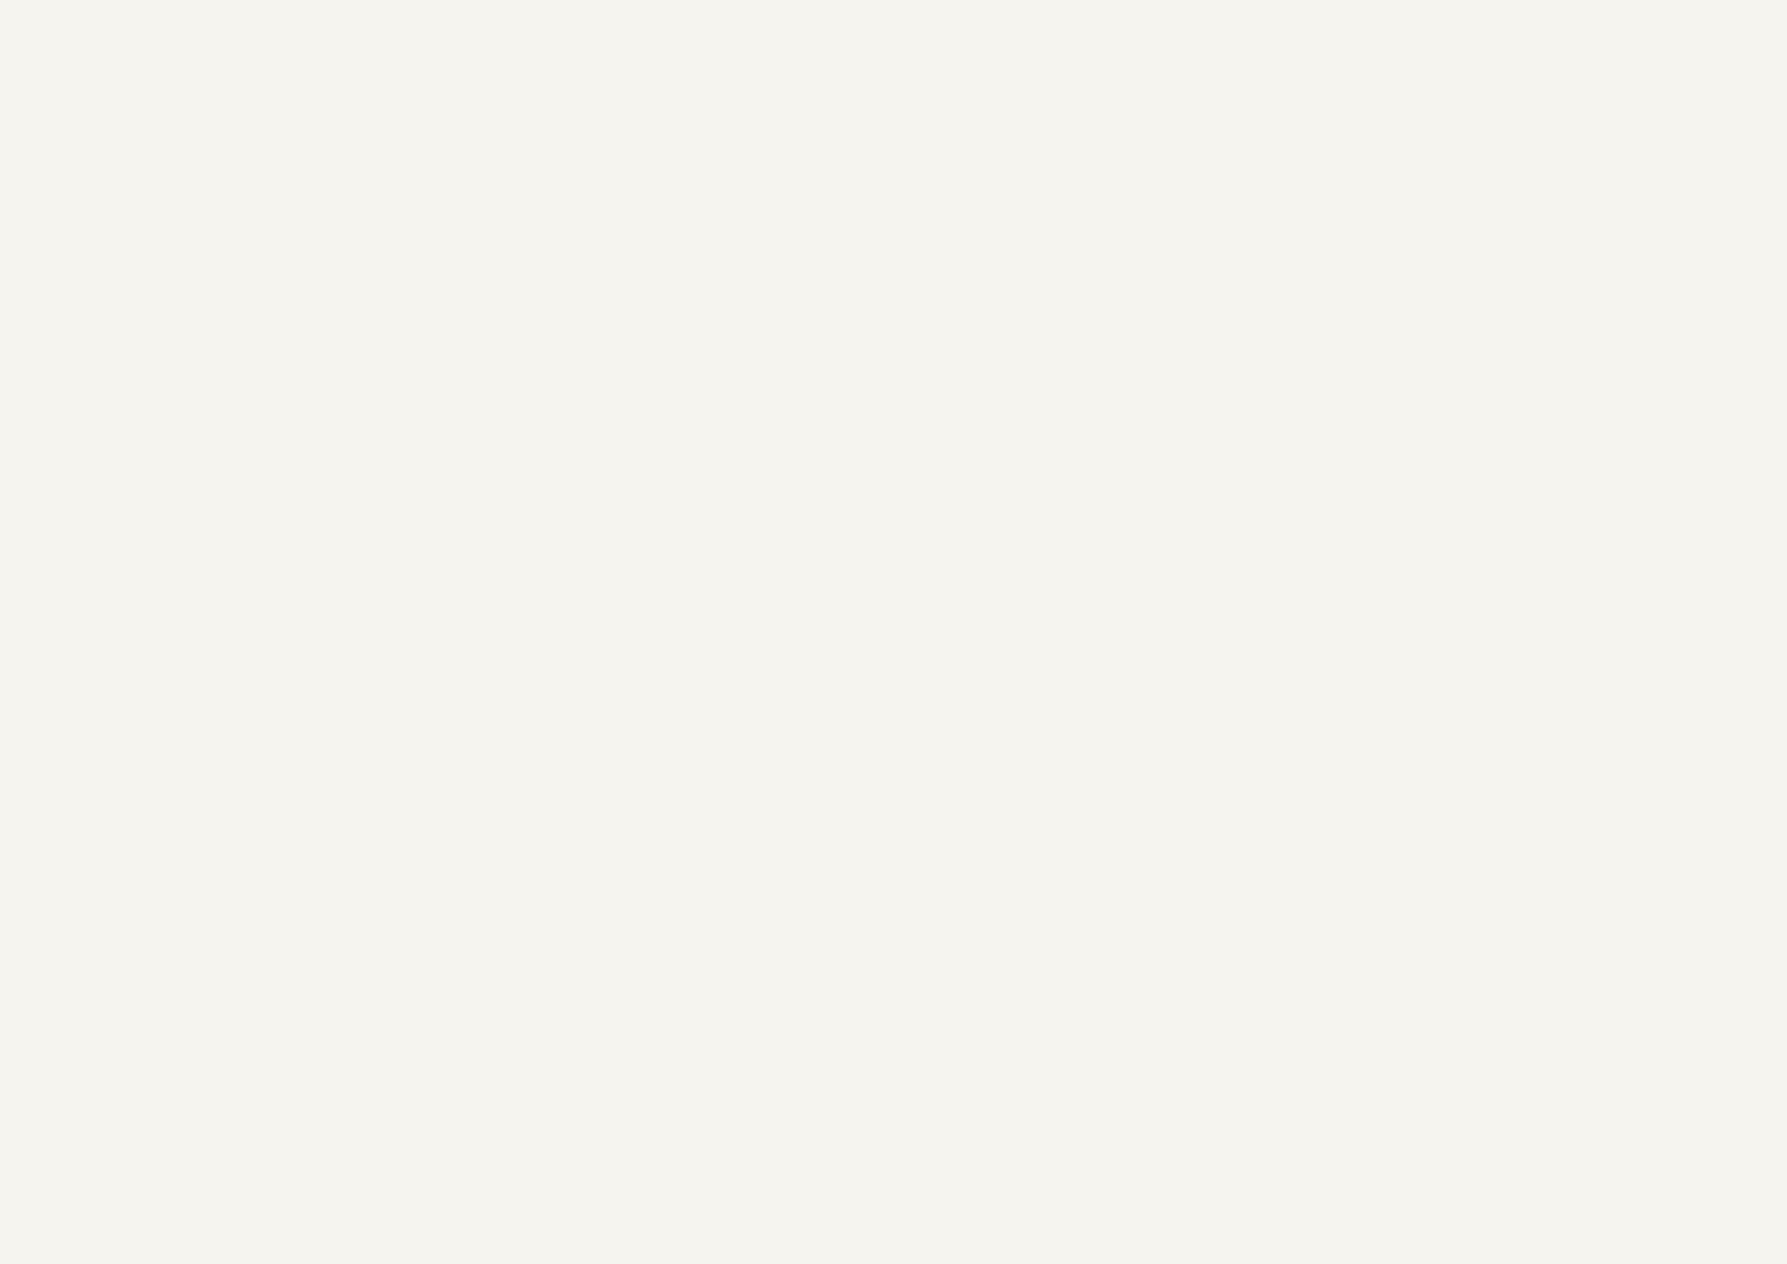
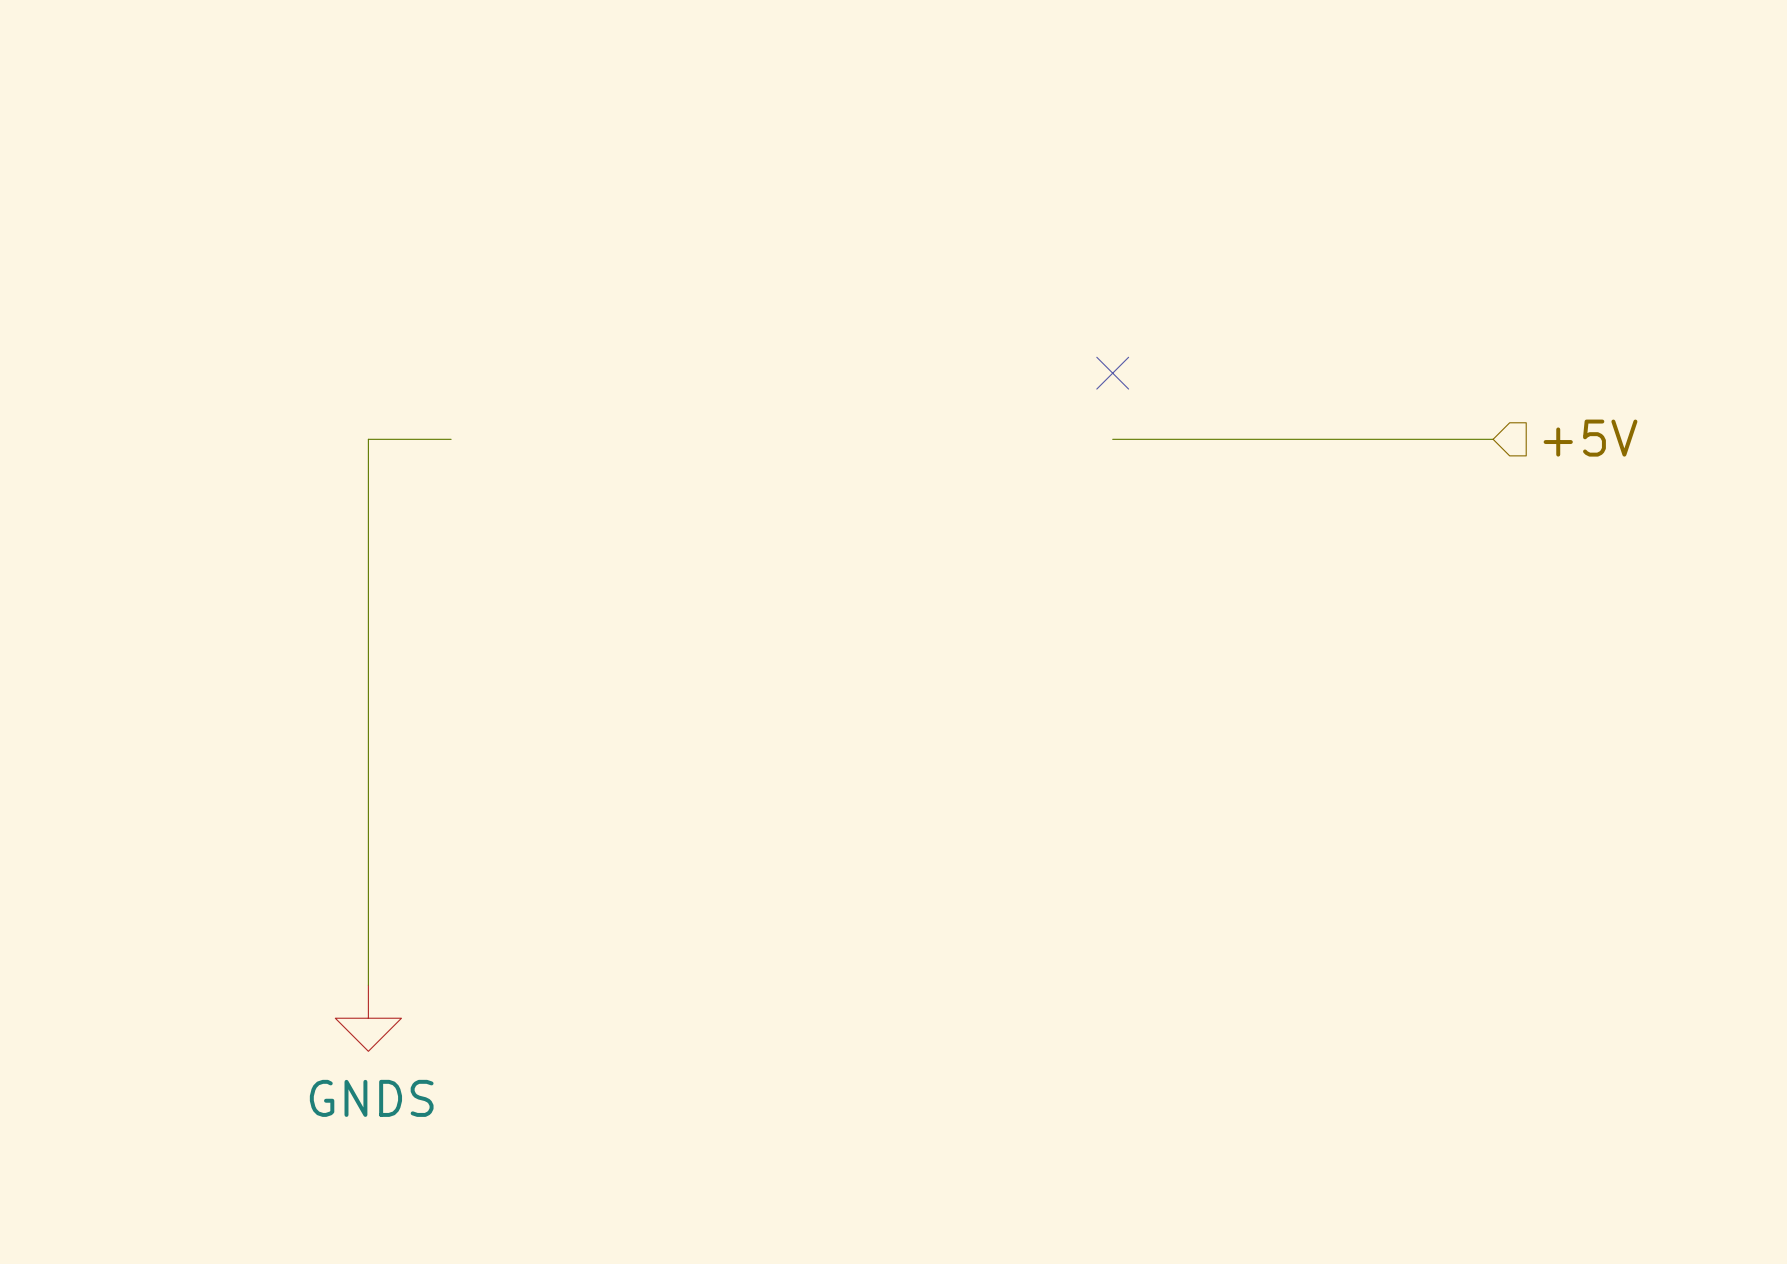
no-connect mark: none -> (1112, 373)
hierarchical label: none -> +5V (1590, 438)
wire: none -> (451, 439) (368, 439) (368, 985)
wire: none -> (1112, 439) (1493, 439)
power symbol: none -> GNDS (368, 1018)

